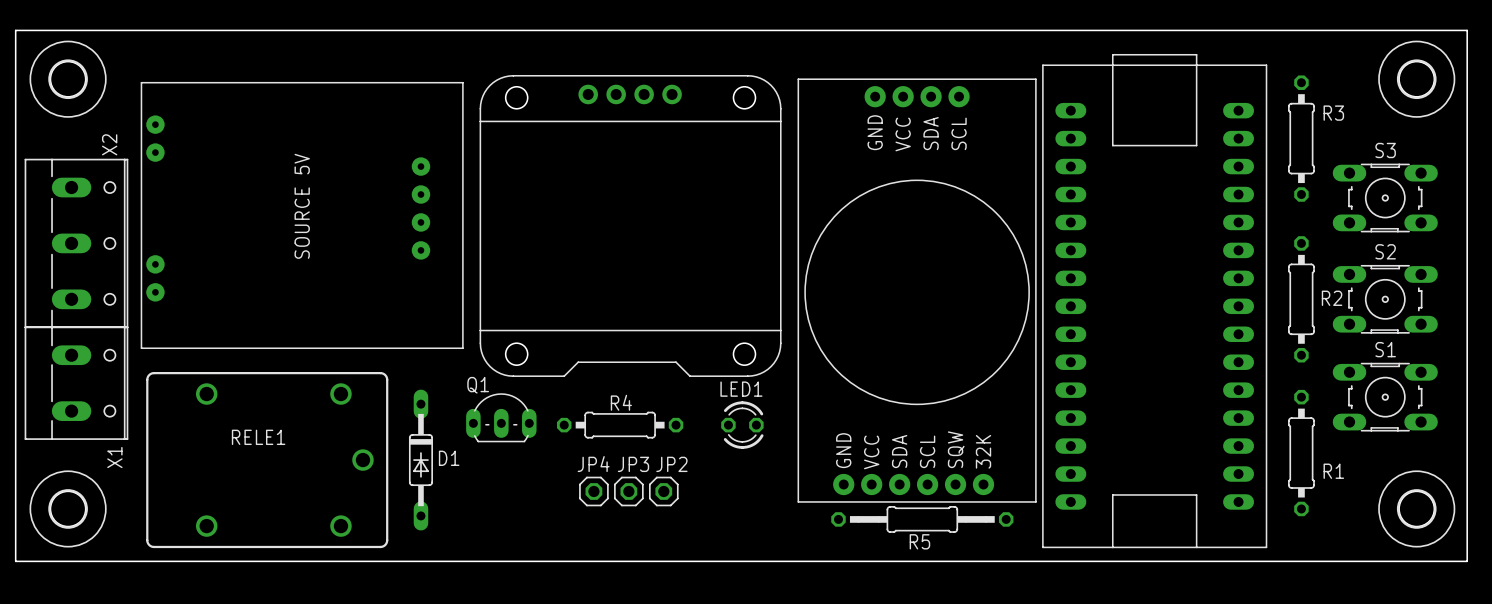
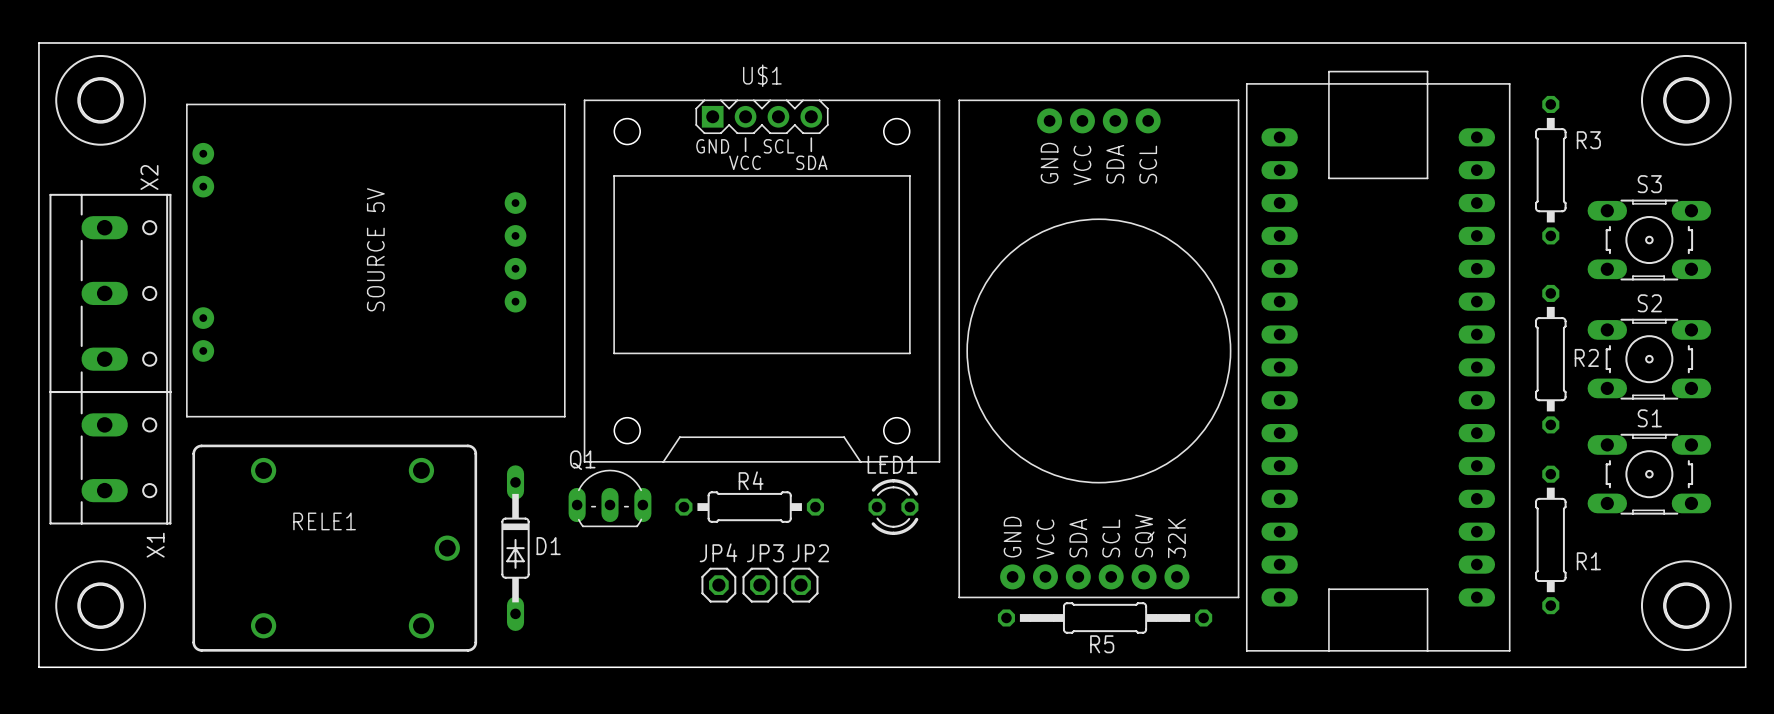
part: (630, 225) -> none
U$1: none -> (762, 281)

